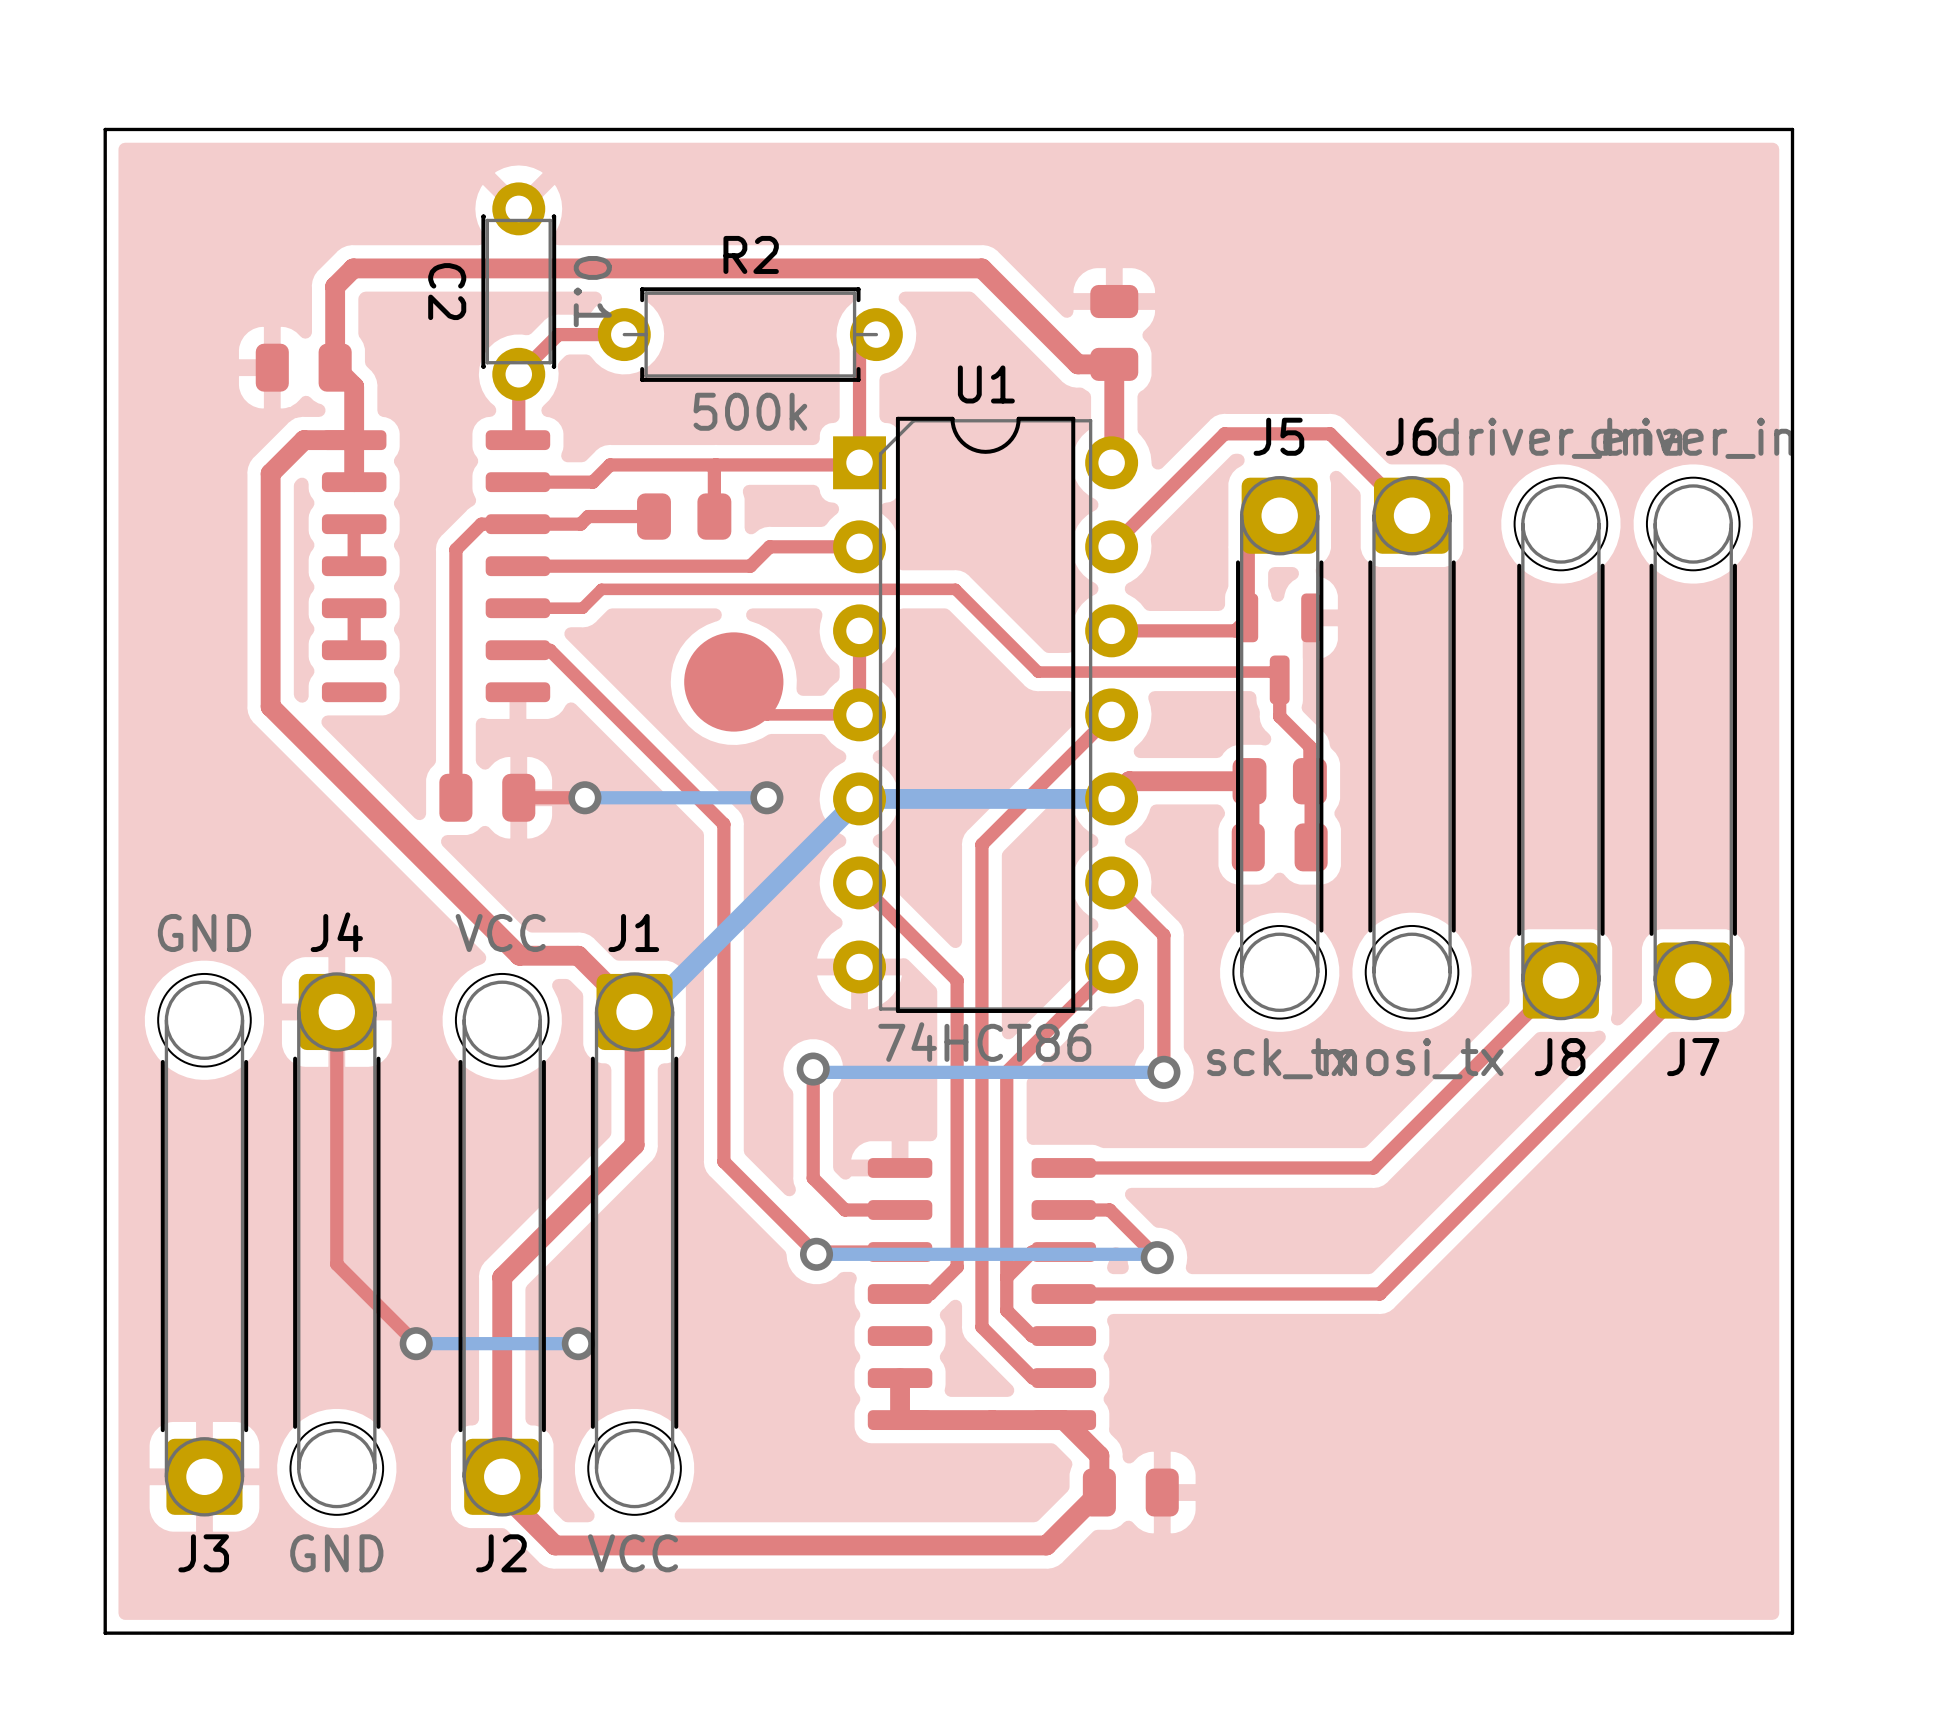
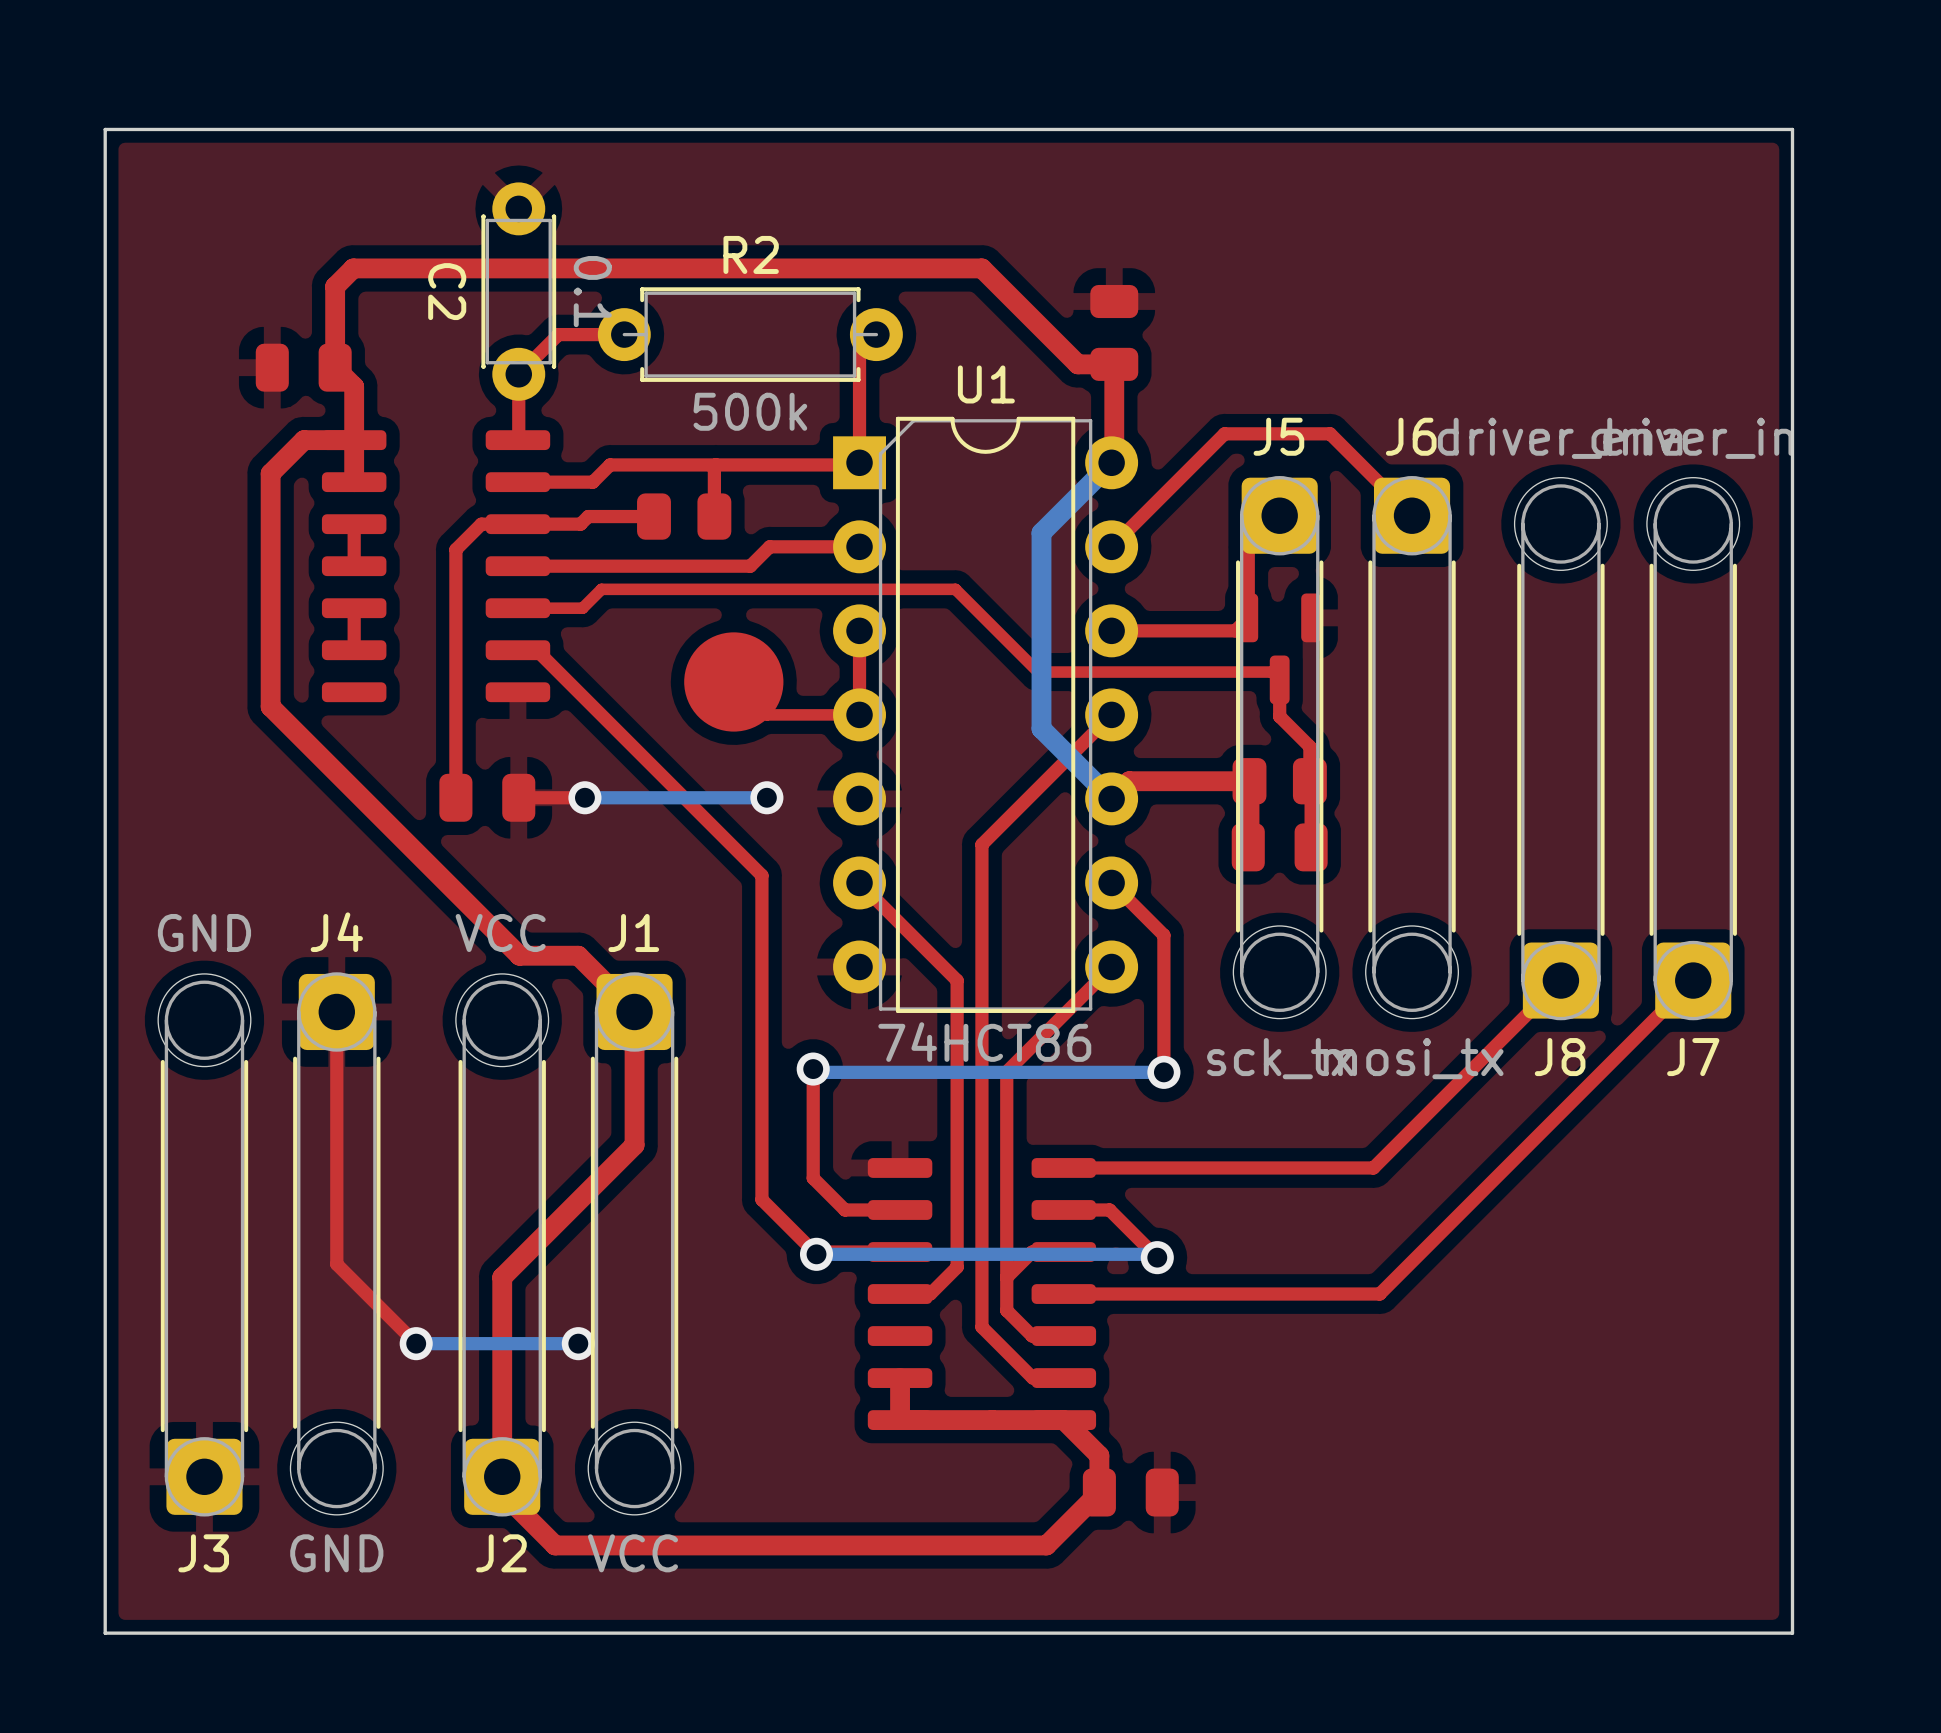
top track: (536, 650) (549, 650) (723, 824) (723, 1161) (761, 1199) -> (536, 650) (761, 875) (761, 1199)
bottom track: (1111, 798) (859, 798) (646, 1011) -> (1111, 798) (1041, 728) (1041, 532) (1111, 462)

